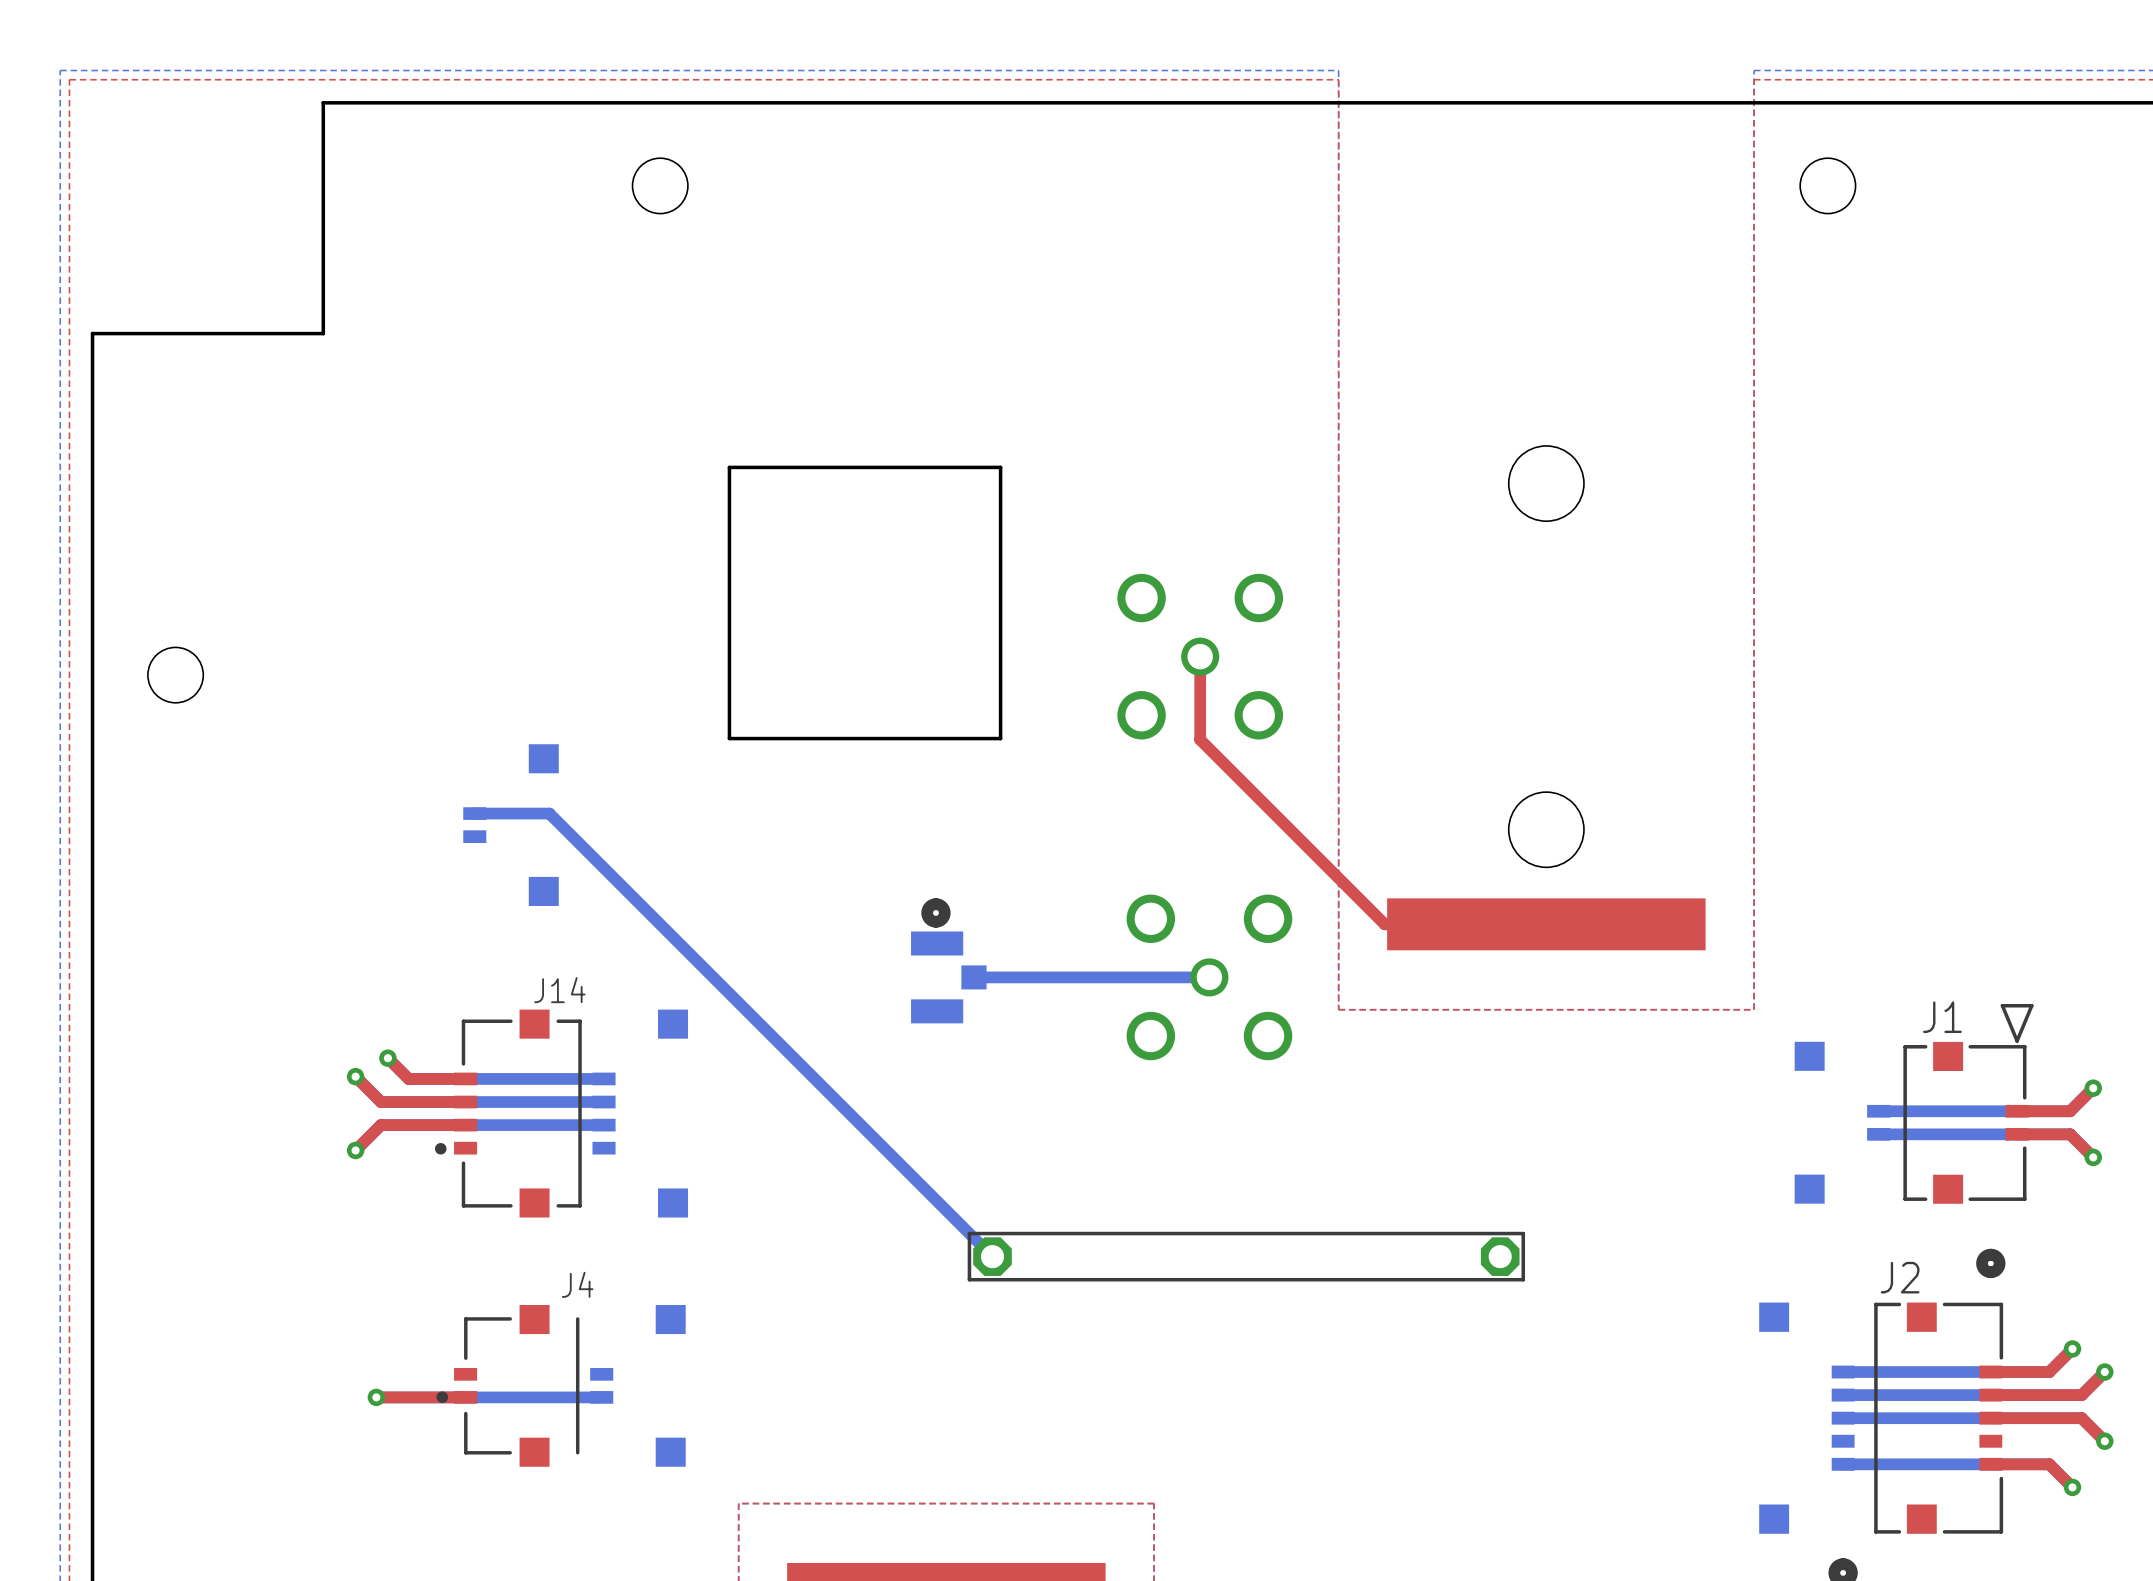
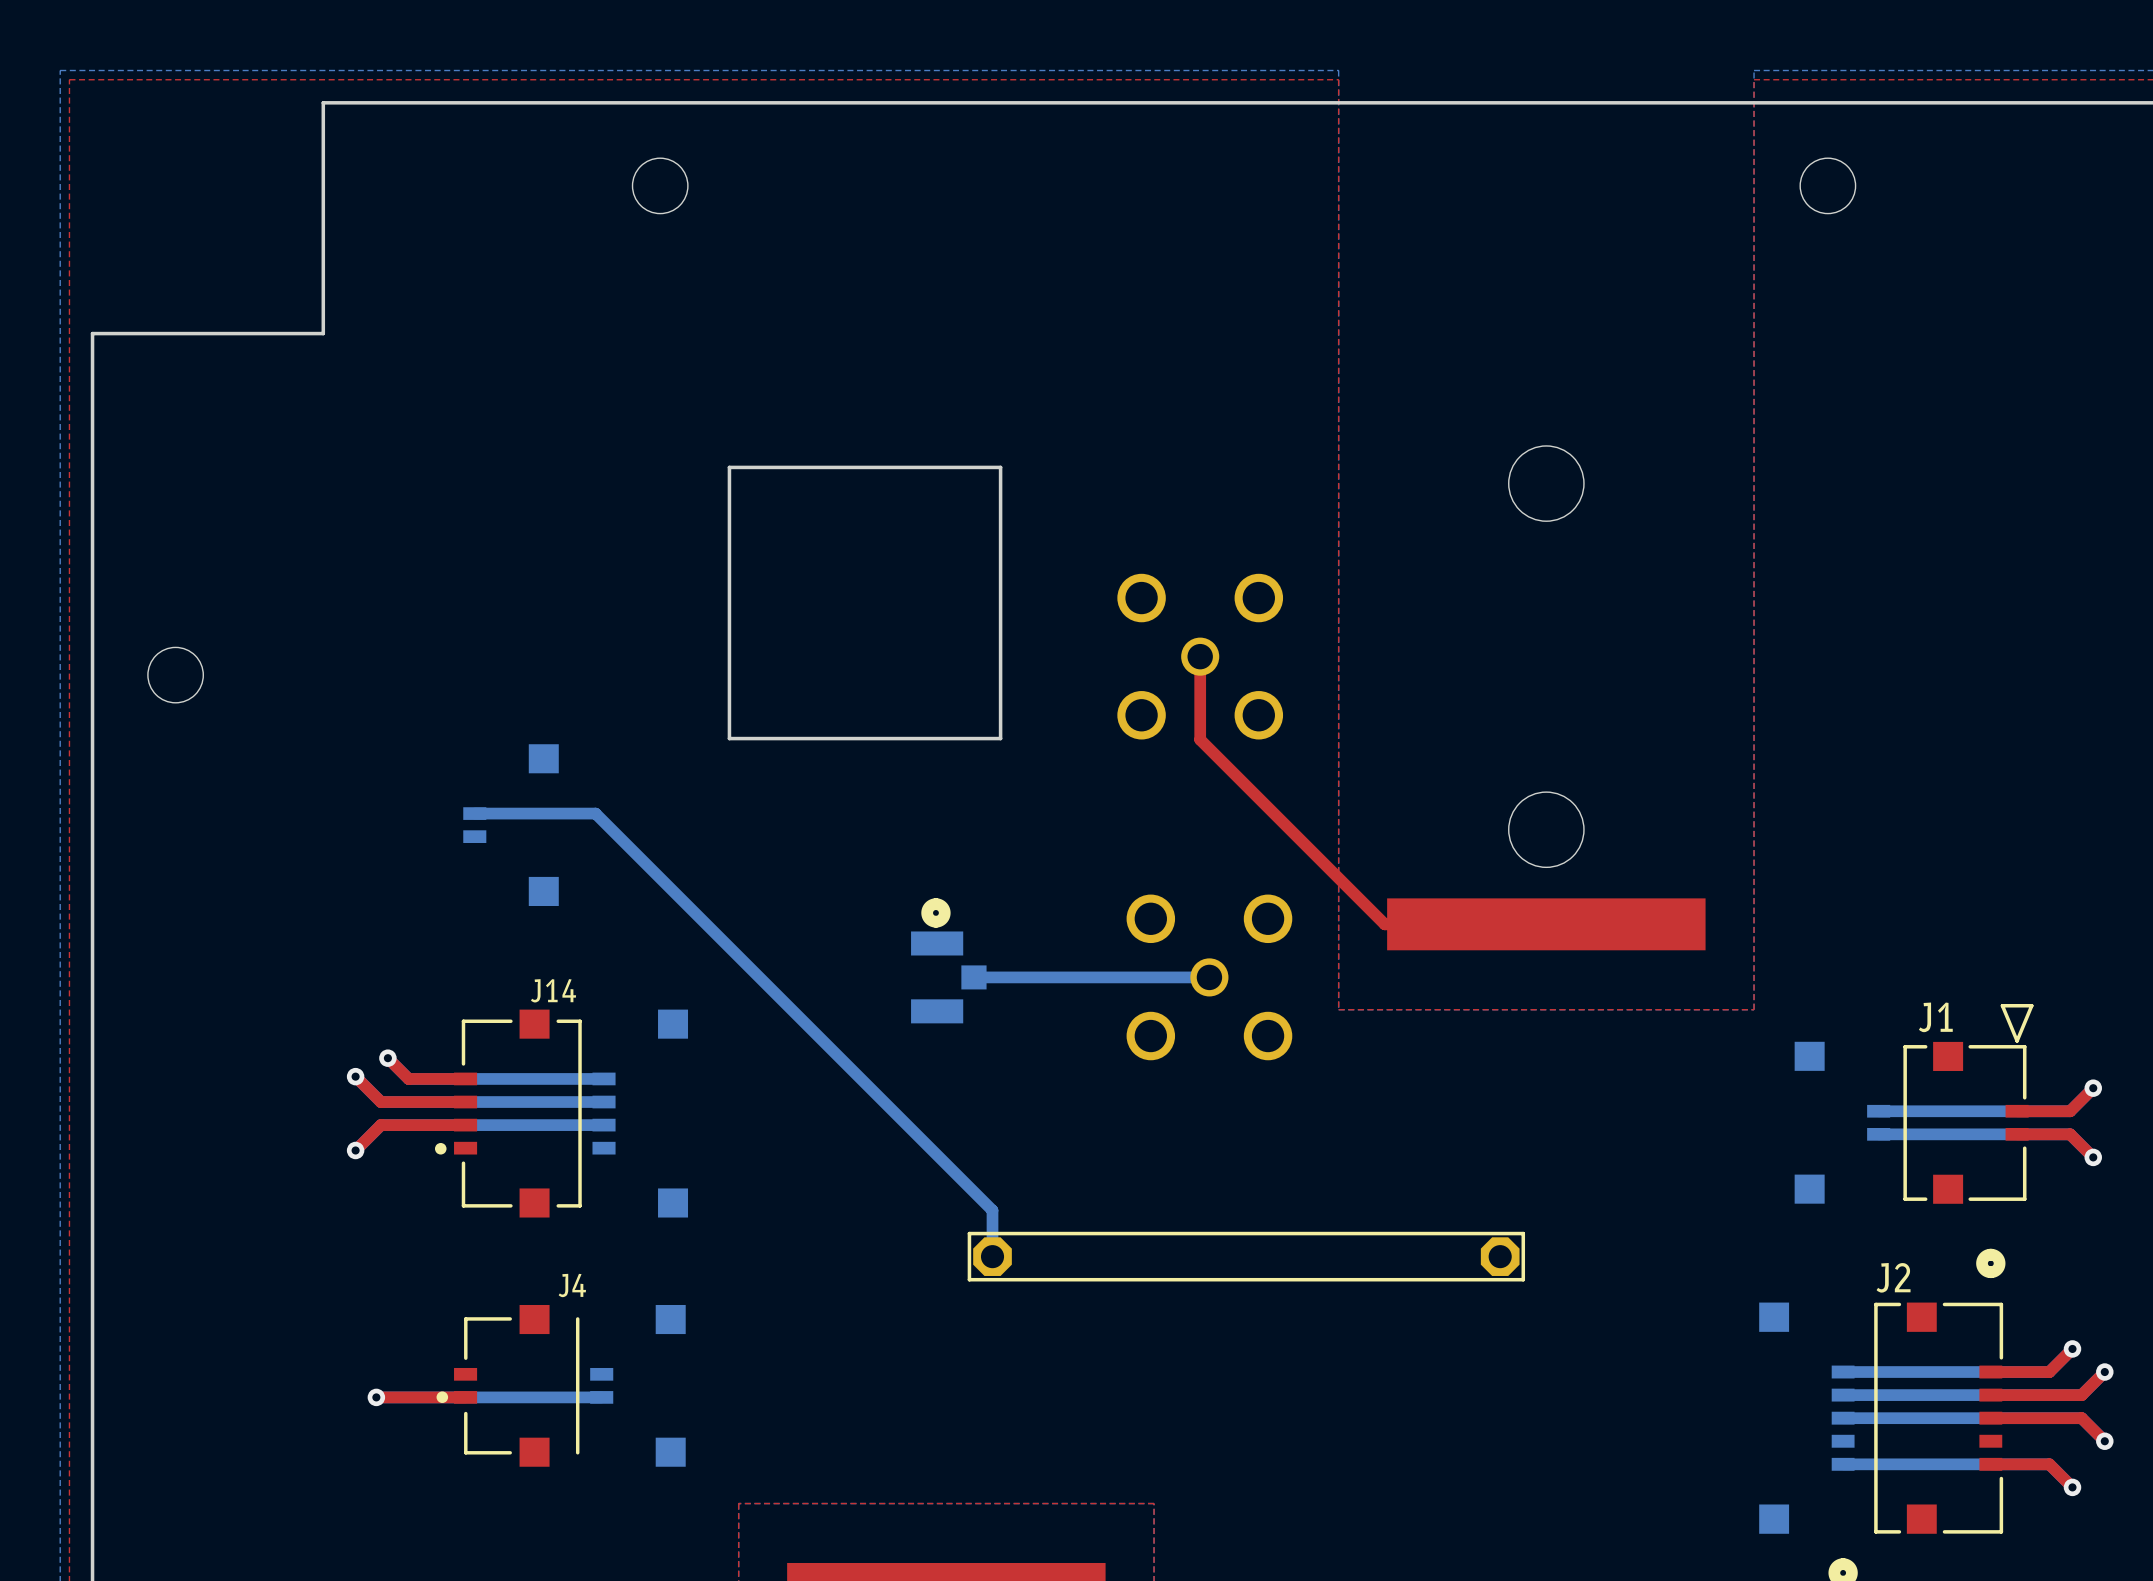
bottom track: (549, 813) (992, 1256) -> (549, 813) (595, 813) (992, 1210) (992, 1256)

